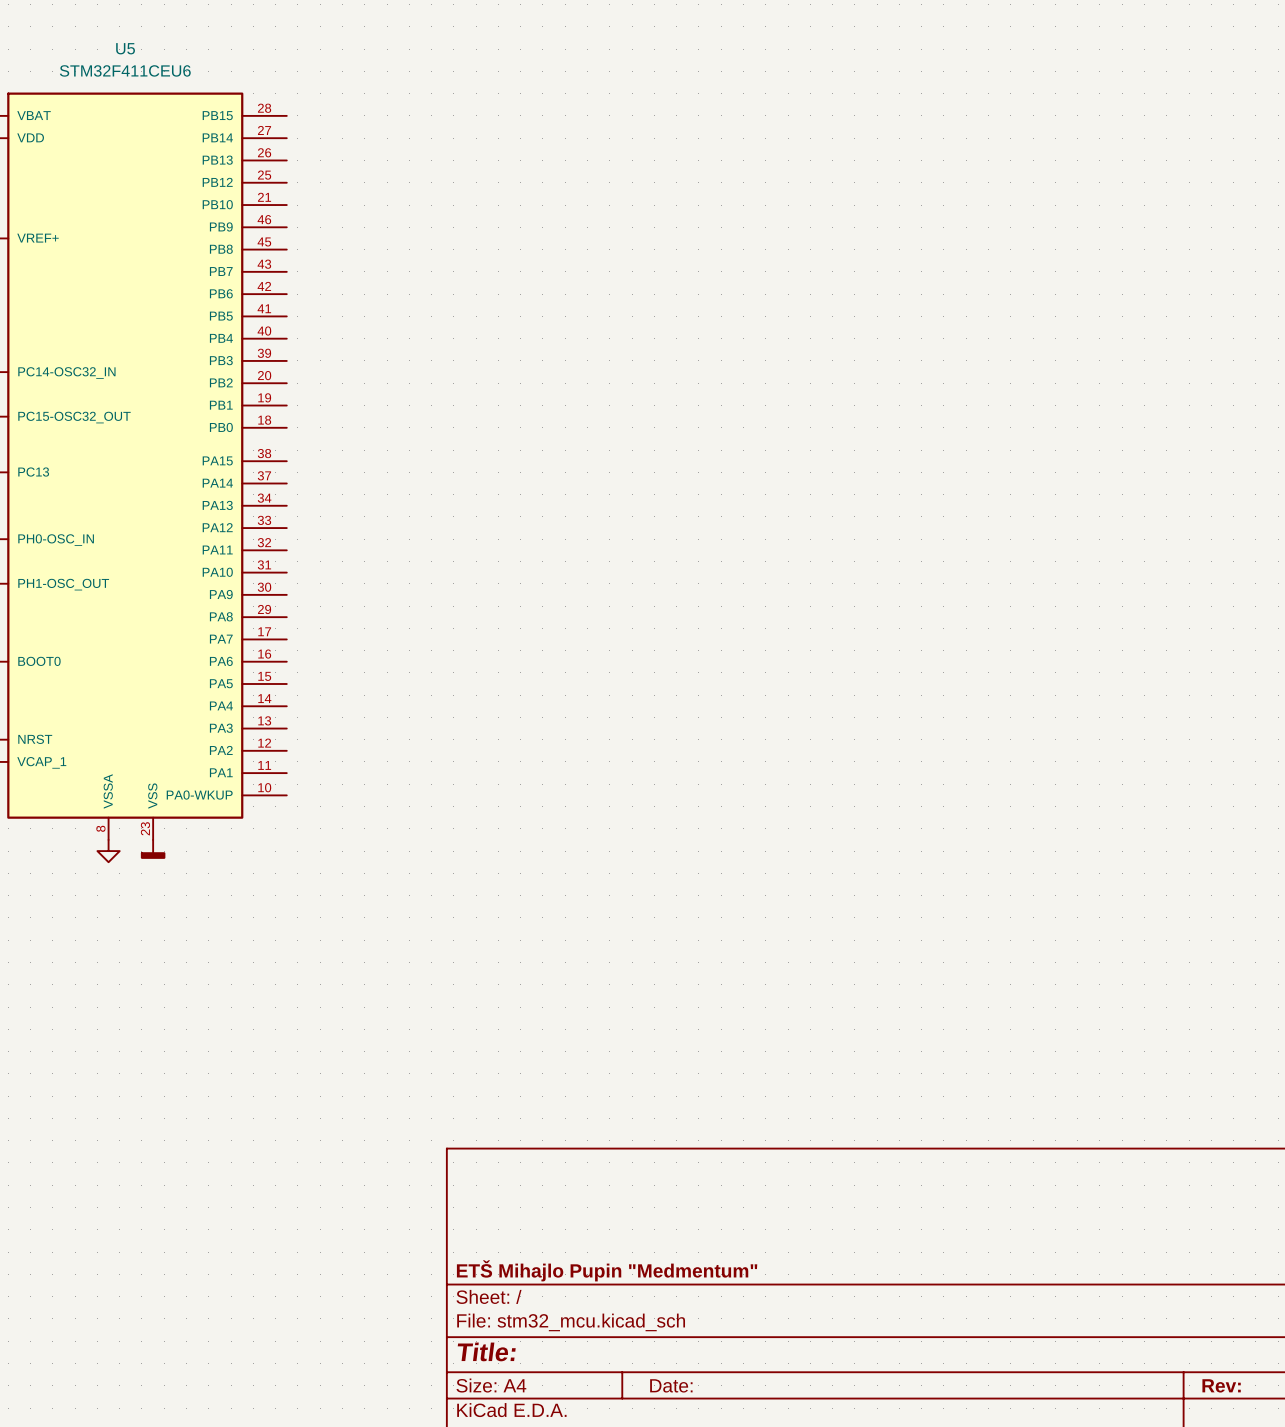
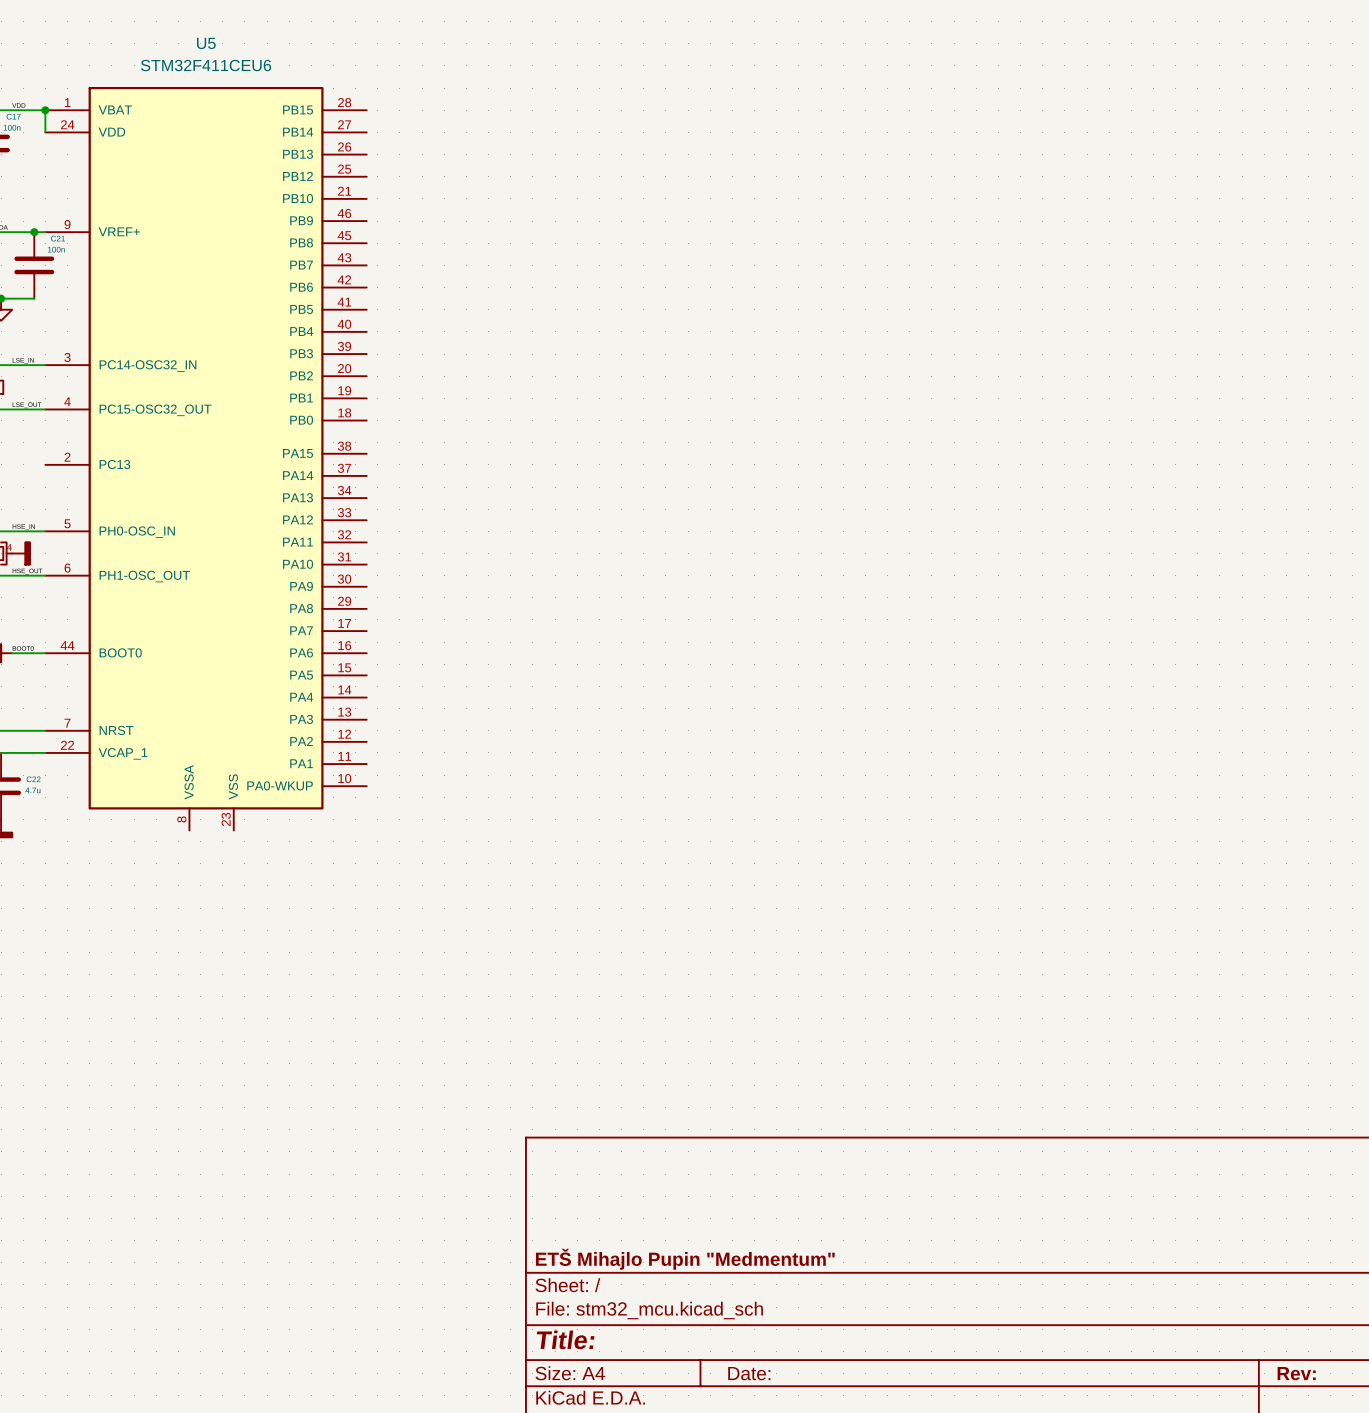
power symbol: (153, 849) -> none
power symbol: (108, 851) -> none

